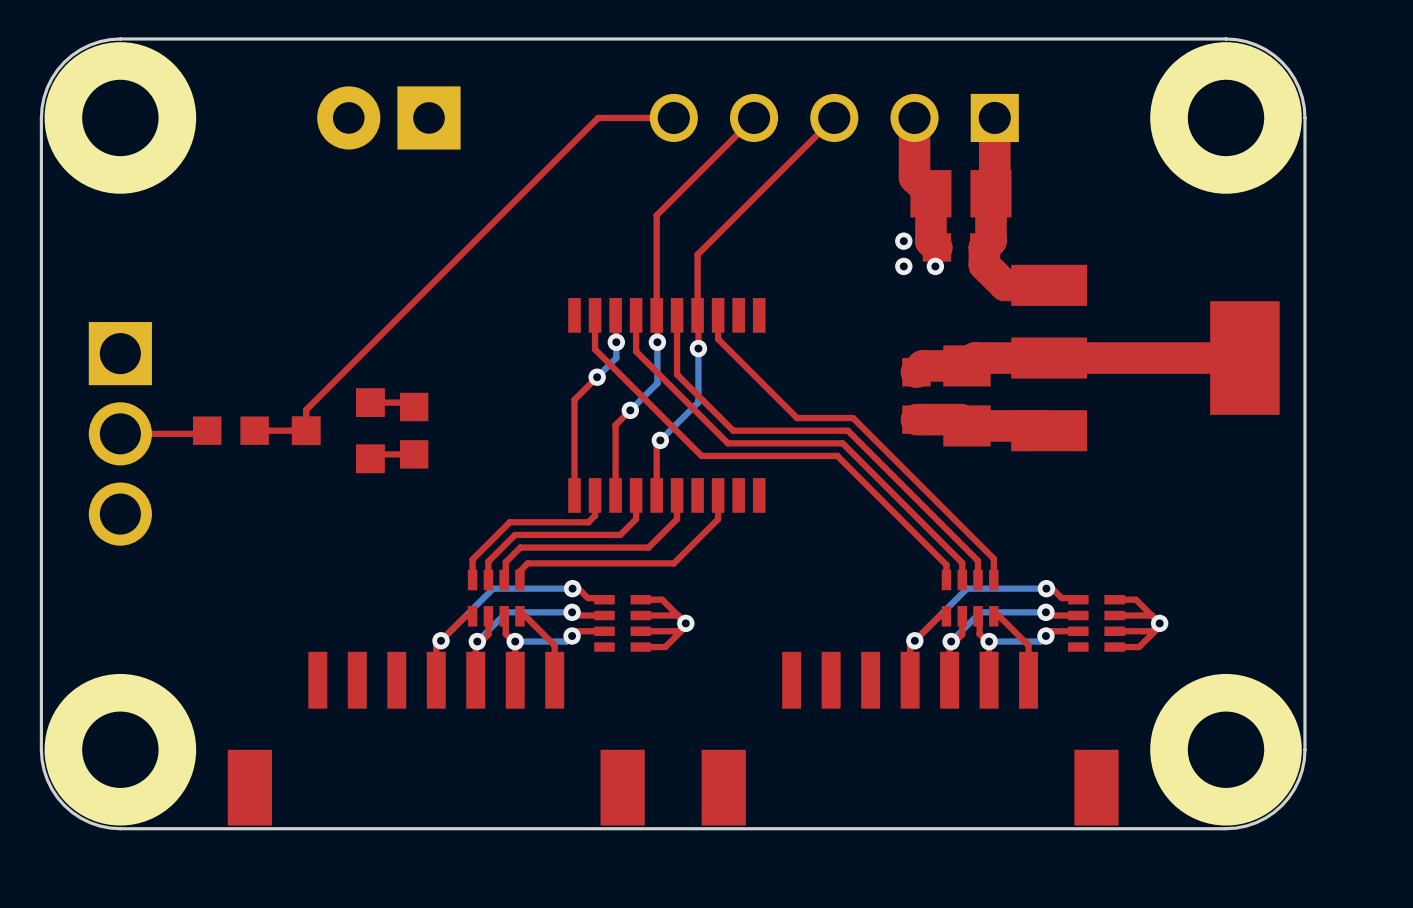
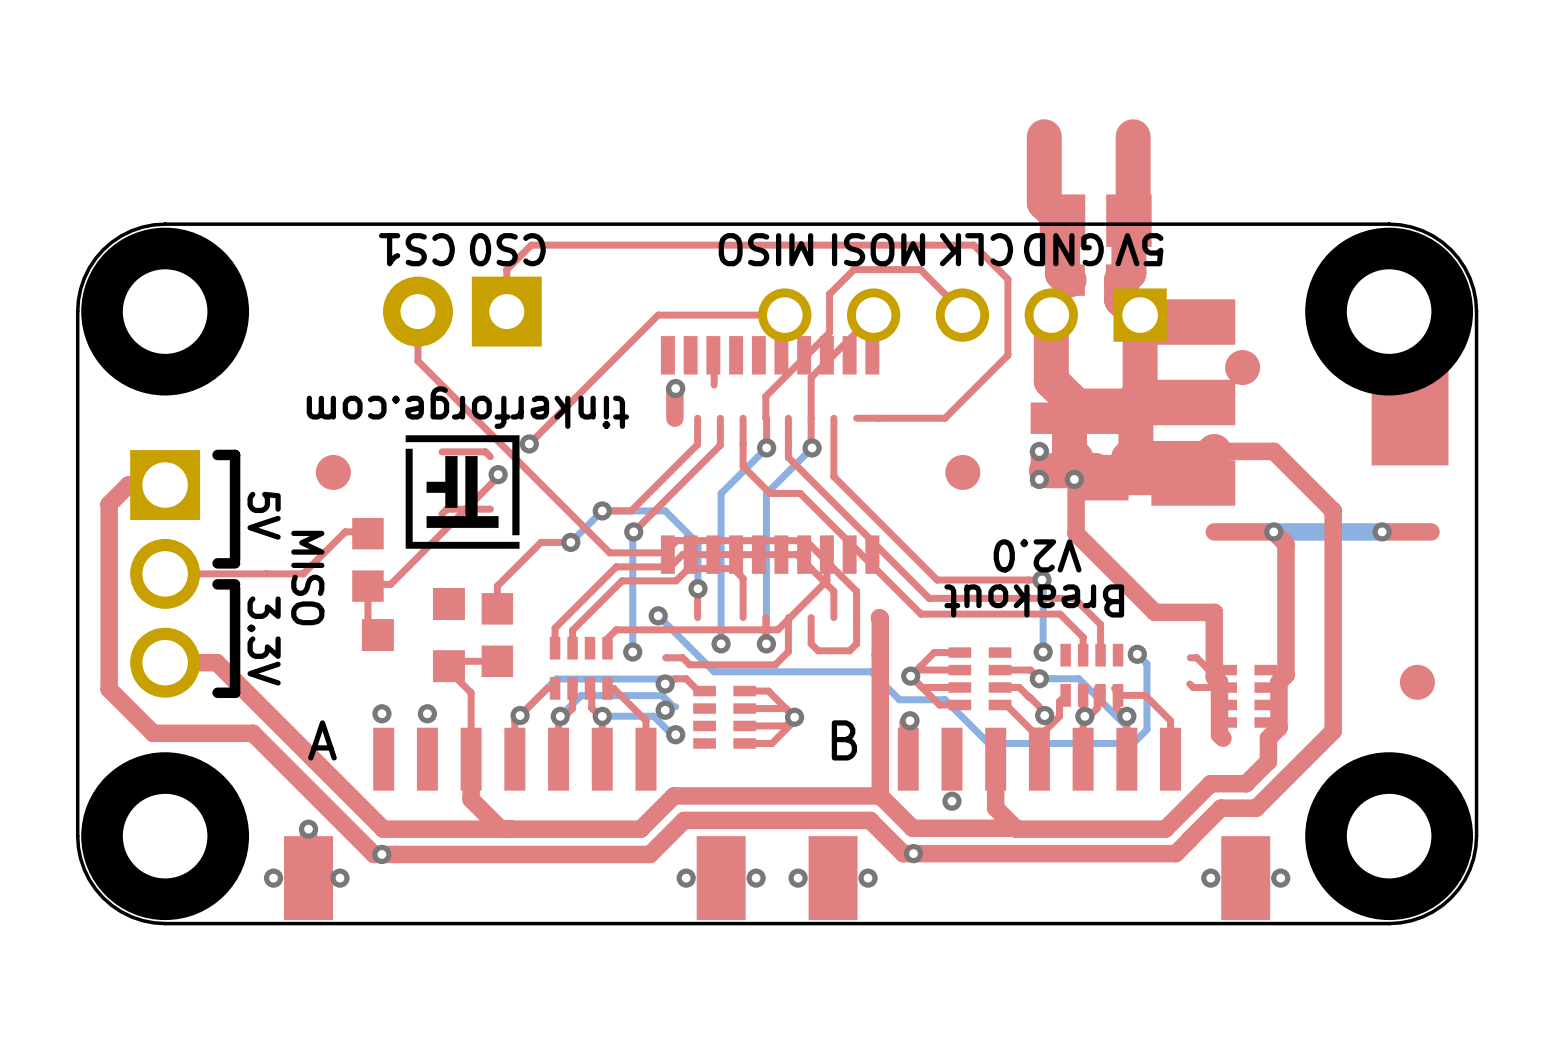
part position: (120, 117) -> (165, 311)
part position: (388, 117) -> (462, 311)
top track: (673, 117) (598, 117) (306, 409) (306, 430) (254, 430) -> none
top track: (754, 117) (656, 215) (657, 342) -> none
top track: (834, 117) (697, 254) (698, 348) -> none
part position: (834, 117) -> (962, 315)
part position: (1226, 117) -> (1389, 311)
text: none -> CS1 (416, 249)
text: none -> CS0 (507, 249)
text: none -> MISO (765, 249)
text: none -> MOSI (878, 249)
text: none -> CLK (976, 249)
text: none -> GND (1063, 249)
text: none -> 5V (1139, 249)
via: (903, 241) -> none
via: (903, 266) -> none
via: (935, 266) -> none
board edge: (41, 275) (41, 117) (44, 97) (57, 69) (72, 55) (99, 41) (120, 38) (1226, 38) (1246, 41) (1265, 49) (1281, 62) (1294, 78) (1302, 97) (1304, 117) (1304, 275) -> (77, 311) (84, 278) (103, 249) (131, 230) (165, 224) (1400, 224) (1422, 230) (1450, 249) (1469, 278) (1476, 311)
top track: none -> (417, 311) (417, 361) (609, 552) (664, 552) (676, 540) (805, 540) (856, 591) (856, 643) (849, 650) (818, 650) (811, 643) (811, 617)
top track: none -> (506, 311) (506, 269) (531, 245) (973, 245) (1007, 279) (1007, 355) (944, 418) (856, 418)
top track: none -> (784, 315) (658, 315) (529, 443)
top track: none -> (873, 315) (811, 377) (812, 447)
top track: none -> (962, 315) (962, 311) (920, 269) (854, 269) (829, 294) (829, 332) (765, 396) (766, 447)
top track: none -> (1051, 315) (1051, 380) (1069, 399) (1069, 451) (1076, 458) (1076, 533) (1154, 612) (1214, 612) (1214, 677) (1219, 682) (1219, 734) (1223, 738)
top track: none -> (1140, 315) (1140, 394) (1135, 399) (1135, 451) (1128, 458) (1207, 458) (1214, 451) (1273, 451) (1333, 510) (1333, 731) (1256, 808) (1220, 808) (1189, 839)
top track: (595, 315) (595, 349) (701, 455) (837, 455) (946, 564) (946, 579) -> none
top track: (636, 315) (636, 351) (727, 443) (842, 443) (962, 562) (962, 579) -> none
top track: (677, 315) (677, 374) (733, 430) (847, 430) (977, 560) (977, 579) (979, 579) -> none
top track: (718, 315) (718, 339) (797, 418) (853, 418) (993, 558) (993, 579) -> none
part: none -> (1242, 367)
bottom track: (616, 342) (616, 358) (597, 377) -> none
via: (616, 342) -> none
bottom track: (657, 342) (657, 383) (630, 410) -> none
via: (657, 342) -> none
top track: none -> (675, 388) (674, 418)
via: none -> (675, 388)
bottom track: (698, 348) (698, 402) (660, 440) -> none
via: (698, 348) -> none
top track: (1244, 358) (974, 358) (966, 365) (922, 365) (916, 372) -> none
text: none -> tinkerforge.com (467, 407)
top track: none -> (697, 418) (697, 444) (631, 510) (602, 510)
top track: none -> (720, 418) (720, 445) (633, 531)
top track: none -> (743, 418) (743, 466) (770, 493) (800, 493) (920, 614) (1060, 614) (1083, 637) (1083, 655)
top track: none -> (788, 418) (788, 457) (929, 598) (1074, 598) (1100, 624) (1100, 655)
top track: none -> (833, 418) (833, 476) (937, 580) (1042, 580)
top track: (597, 377) (574, 399) (574, 495) -> none
via: (597, 377) -> none
drawing: none -> [405, 435, 520, 549]
via: none -> (529, 443)
bottom track: none -> (766, 447) (721, 493) (721, 643)
via: none -> (766, 447)
bottom track: none -> (812, 447) (766, 493) (766, 643)
via: none -> (812, 447)
via: none -> (1039, 451)
line: none -> (217, 454) (235, 454) (235, 559)
top track: (630, 410) (615, 425) (615, 495) -> none
via: (630, 410) -> none
part: none -> (333, 472)
part: none -> (962, 472)
top track: none -> (498, 474) (498, 476) (390, 584) (367, 584) (367, 625) (377, 635) (371, 641)
via: none -> (498, 474)
via: none -> (1039, 479)
via: none -> (1074, 479)
top track: (207, 430) (204, 433) (120, 433) -> none
part: (230, 430) -> none
part position: (338, 430) -> (413, 635)
part: (414, 430) -> none
top track: none -> (165, 485) (128, 485) (109, 504) (109, 689) (153, 733) (252, 733) (374, 854) (650, 854) (684, 820) (870, 820) (903, 853) (1175, 853) (1189, 839)
part position: (120, 433) -> (165, 573)
top track: (660, 440) (656, 444) (656, 495) -> none
via: (660, 440) -> none
via: none -> (602, 510)
text: none -> 5V (264, 515)
top track: none -> (367, 531) (345, 531) (303, 573) (165, 573)
bottom track: none -> (633, 531) (632, 652)
via: none -> (633, 531)
top track: none -> (1214, 531) (1273, 531) (1285, 544) (1285, 675) (1278, 682) (1278, 727) (1268, 738) (1268, 761) (1246, 783) (1210, 783) (1165, 829) (1016, 829) (995, 808) (995, 759)
bottom track: none -> (1273, 531) (1382, 531)
via: none -> (1273, 531)
top track: none -> (1382, 531) (1431, 531)
via: none -> (1382, 531)
top track: none -> (570, 542) (541, 542) (497, 586) (497, 608) (499, 607)
bottom track: none -> (570, 542) (602, 510) (665, 510) (698, 543) (698, 588)
via: none -> (570, 542)
top track: (595, 495) (595, 515) (588, 522) (509, 522) (472, 559) (472, 561) -> (833, 617) (833, 591) (797, 554) (682, 554) (670, 566) (616, 566) (555, 628)
top track: (636, 495) (636, 519) (620, 534) (515, 534) (488, 561) (488, 563) -> (743, 617) (743, 578) (733, 568) (688, 568) (676, 580) (622, 580) (572, 630)
top track: (677, 495) (677, 519) (648, 547) (520, 547) (505, 562) (505, 579) (504, 579) -> none
text: none -> V2.0 (1037, 555)
part: none -> (367, 559)
line: none -> (217, 563) (235, 563)
text: none -> MISO (307, 578)
bottom track: none -> (1042, 580) (1043, 652)
via: none -> (1042, 580)
line: none -> (217, 584) (235, 584)
line: none -> (235, 587) (235, 692) (217, 692)
top track: none -> (697, 589) (697, 617)
via: none -> (698, 588)
text: none -> Breakout (1034, 600)
bottom track: none -> (658, 615) (714, 671) (871, 671) (899, 699) (944, 699) (988, 743) (1133, 743) (1146, 729) (1146, 663) (1137, 654)
via: none -> (658, 615)
top track: none -> (765, 617) (766, 643)
top track: none -> (879, 617) (880, 795)
part: none -> (497, 635)
text: none -> 3.3V (264, 640)
via: none -> (721, 643)
via: none -> (766, 643)
via: none -> (632, 652)
top track: none -> (959, 652) (934, 652) (910, 676) (939, 704) (959, 704)
via: none -> (1043, 652)
via: none -> (1137, 654)
bottom track: (572, 588) (493, 588) (473, 607) -> (675, 679) (556, 679)
via: (572, 588) -> none
top track: (578, 588) (587, 598) (604, 599) -> (672, 657) (682, 657) (689, 664) (775, 664) (788, 651) (788, 617)
bottom track: (1046, 588) (966, 588) (914, 640) -> none
via: (1046, 588) -> none
top track: none -> (497, 661) (453, 661) (448, 666) (448, 670) (471, 692) (471, 799) (500, 829)
top track: none -> (165, 662) (216, 662) (383, 829) (640, 829) (673, 795) (880, 795)
part position: (970, 598) -> (1091, 675)
top track: (640, 599) (662, 599) (685, 623) -> (744, 691) (768, 691) (794, 717)
top track: none -> (916, 670) (959, 670)
top track: none -> (1000, 670) (1030, 670) (1039, 678)
top track: (1114, 599) (1136, 599) (1159, 623) -> none
via: none -> (910, 676)
top track: none -> (675, 678) (686, 678) (698, 691) (704, 691)
part: none -> (979, 678)
bottom track: none -> (1039, 678) (1078, 678) (1123, 723)
via: none -> (1039, 678)
part: none -> (1417, 682)
top track: (572, 612) (575, 615) (604, 615) -> none
bottom track: (572, 612) (506, 612) (496, 622) -> (675, 706) (662, 695) (581, 695)
bottom track: (1045, 612) (980, 612) (951, 641) -> none
via: (1045, 612) -> none
top track: (640, 615) (677, 615) -> (744, 708) (785, 708)
top track: none -> (922, 687) (959, 687)
top track: none -> (1000, 687) (1019, 687) (1039, 706)
top track: (1114, 615) (1151, 615) -> none
top track: (946, 616) (939, 616) (910, 645) (910, 654) -> none
top track: (993, 616) (999, 616) (1005, 622) -> (1118, 695) (1145, 695)
top track: none -> (1065, 695) (1059, 701) (1059, 716) (1044, 731) (1032, 731) (1006, 704) (1000, 704)
part position: (622, 623) -> (724, 717)
top track: (685, 623) (677, 631) (640, 631) -> (794, 717) (785, 725) (744, 725)
top track: (685, 623) (685, 626) (665, 647) (640, 647) -> (794, 717) (794, 720) (771, 743) (744, 743)
via position: (685, 623) -> (794, 717)
top track: (1159, 623) (1159, 626) (1139, 647) (1114, 647) -> none
top track: (1159, 623) (1151, 631) (1114, 631) -> none
via: (1159, 623) -> none
top track: (604, 631) (576, 631) (572, 636) -> none
top track: (1078, 631) (1050, 631) (1045, 636) -> none
bottom track: (572, 636) (566, 641) (515, 641) -> none
bottom track: (1045, 636) (1040, 641) (989, 641) -> none
via: (1045, 636) -> none
via: none -> (381, 713)
via: none -> (427, 713)
bottom track: none -> (599, 716) (653, 716) (672, 734) (675, 734)
via: none -> (910, 720)
via: none -> (675, 734)
text: none -> A (322, 740)
text: none -> B (844, 740)
top track: none -> (880, 795) (912, 828) (1015, 828)
via: none -> (951, 801)
via: none -> (308, 829)
via: none -> (913, 853)
via: none -> (381, 854)
via: none -> (273, 878)
via: none -> (339, 878)
via: none -> (686, 878)
via: none -> (756, 878)
via: none -> (798, 878)
via: none -> (868, 878)
via: none -> (1210, 878)
via: none -> (1280, 878)

